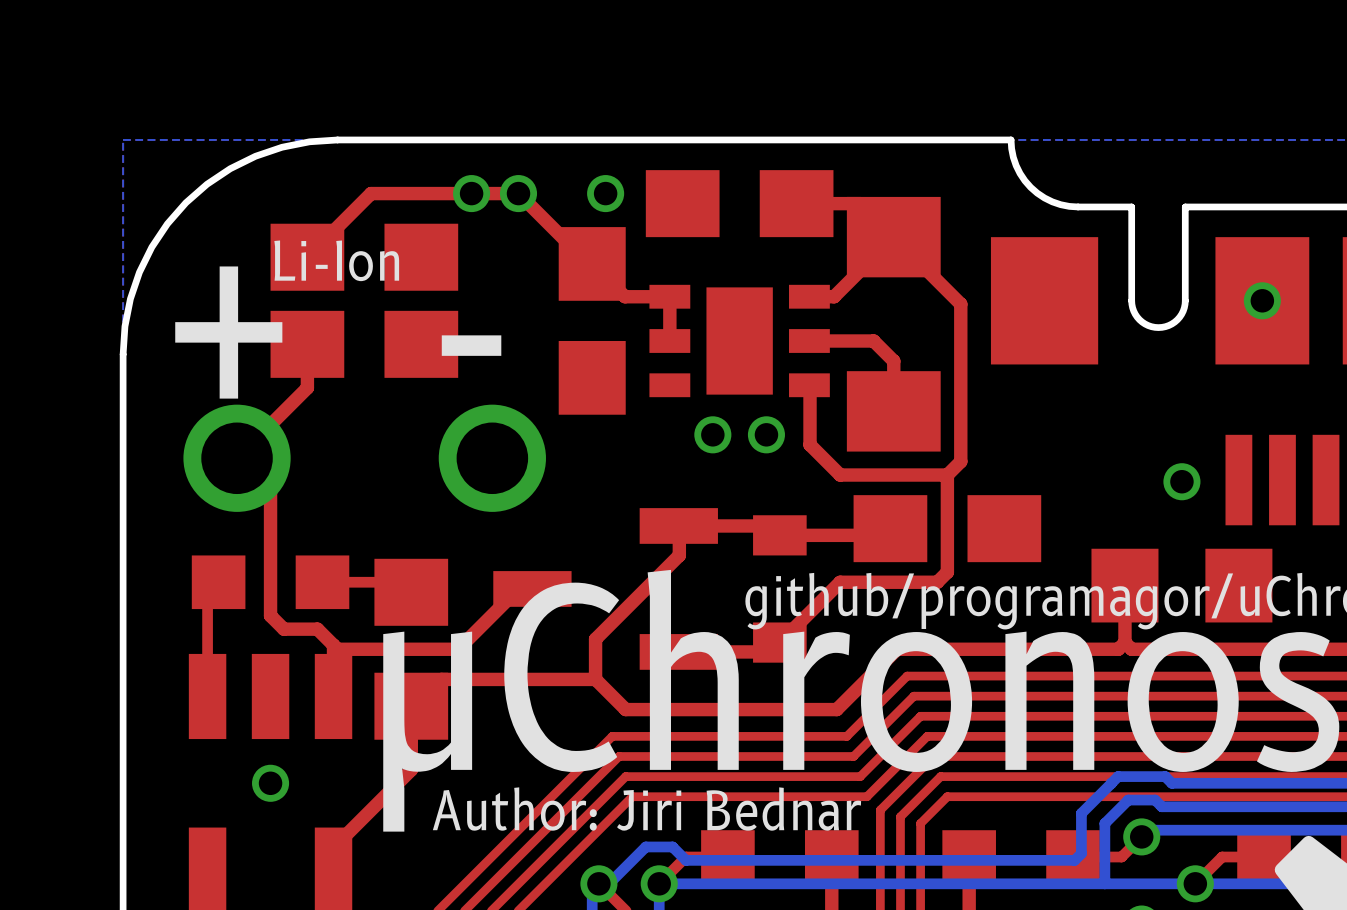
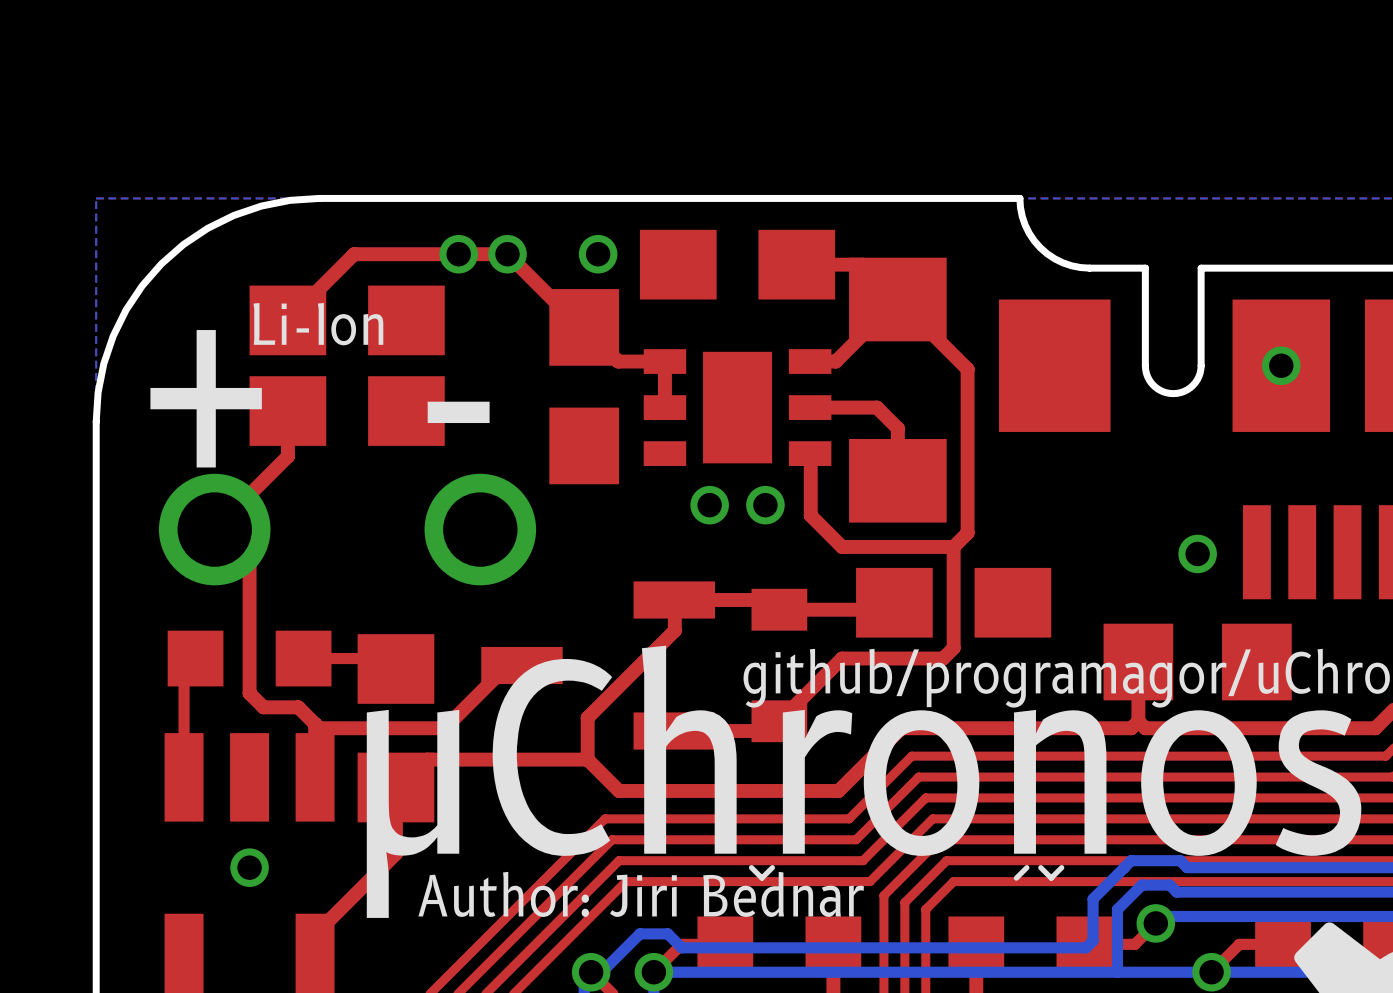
line: none -> (772, 867) (761, 878) (751, 867)
line: none -> (1026, 867) (1016, 878)
line: none -> (1061, 867) (1051, 878) (1040, 867)

